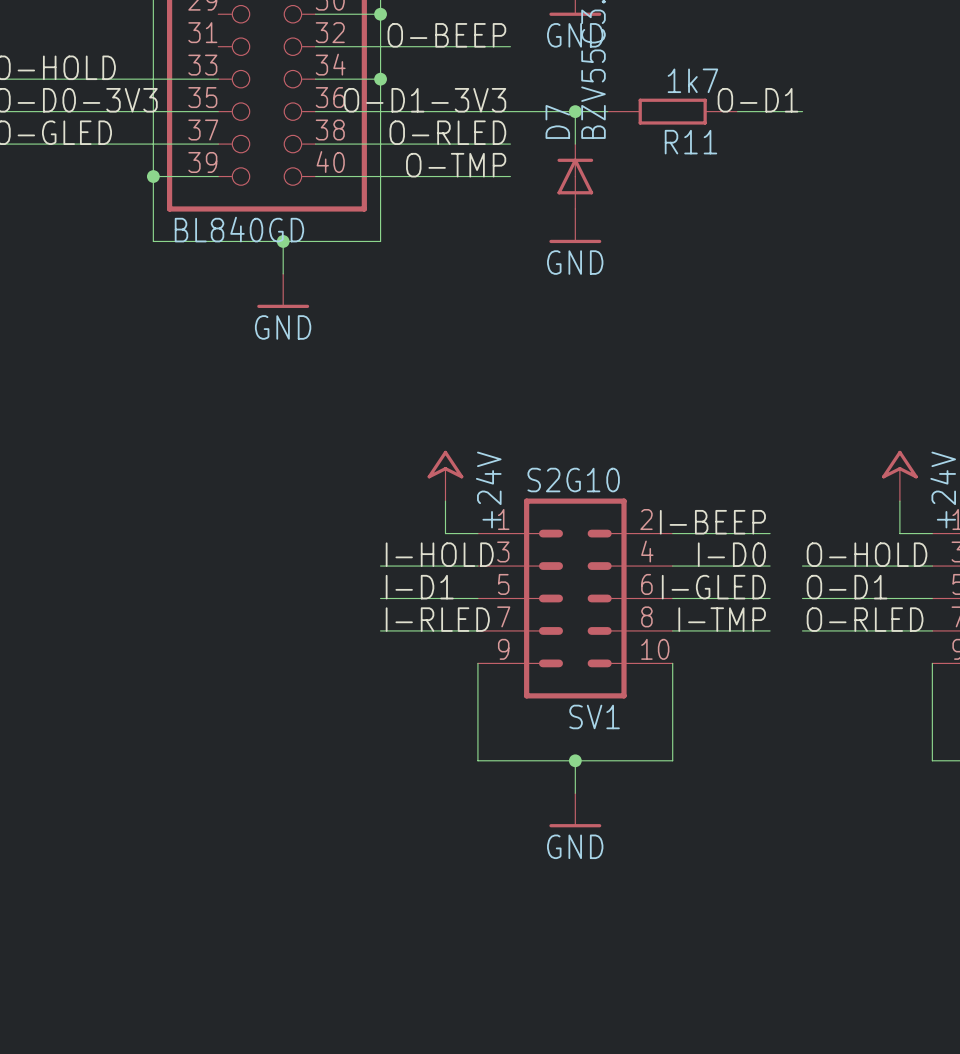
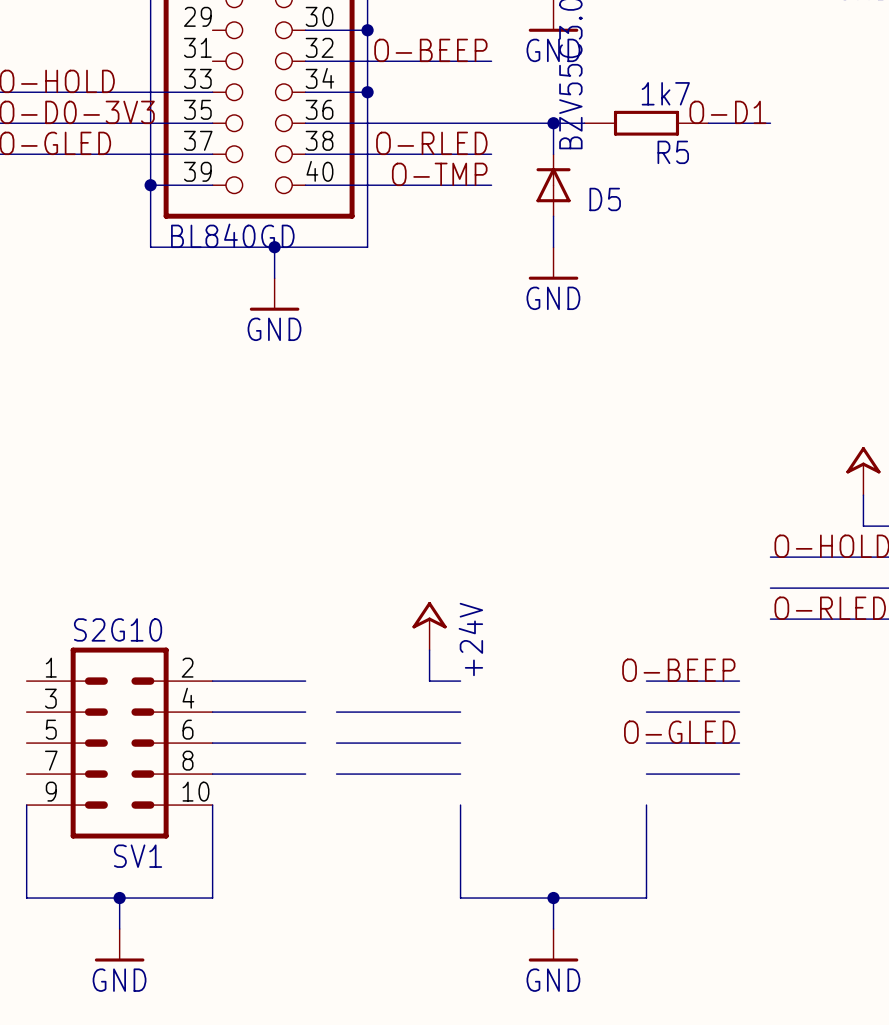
label: O-D1-3V3 (424, 100) -> none
D7 name: D7 (557, 121) -> D5 (605, 199)
R11 name: R11 (690, 142) -> R5 (673, 152)
power symbol position: GND (575, 226) -> GND (553, 263)
power symbol position: +24V (445, 475) -> +24V (429, 626)
wire: (445, 501) (445, 533) (477, 533) -> (429, 650) (429, 681) (460, 681)
label: I-BEEP (712, 522) -> none
wire: (672, 533) (770, 533) -> (646, 681) (739, 681)
label: I-HOLD (439, 554) -> none
label: I-D0 (731, 554) -> none
wire: (380, 566) (477, 566) -> (212, 681) (305, 681)
wire: (672, 566) (770, 566) -> (646, 712) (739, 712)
label: I-D1 (419, 587) -> none
label: I-GLED (713, 587) -> none
label: O-D1 (847, 587) -> none
wire: (380, 598) (477, 598) -> (212, 712) (305, 712)
SV1 position: (575, 598) -> (119, 743)
wire: (672, 598) (770, 598) -> (646, 743) (739, 743)
label: I-RLED (437, 619) -> none
label: I-TMP (722, 619) -> none
wire: (380, 630) (477, 630) -> (212, 743) (305, 743)
wire: (672, 630) (770, 630) -> (646, 774) (739, 774)
wire: (477, 663) (477, 760) (672, 760) (672, 663) -> (460, 805) (460, 898) (646, 898) (646, 805)
label: none -> O-BEEP (678, 670)
wire: none -> (336, 712) (460, 712)
label: none -> O-GLED (679, 732)
wire: none -> (336, 743) (460, 743)
wire: (575, 760) (575, 793) -> (553, 898) (553, 929)
junction: (575, 760) -> none
wire: none -> (212, 774) (305, 774)
wire: none -> (336, 774) (460, 774)
power symbol position: GND (575, 810) -> GND (553, 945)
wire: none -> (26, 805) (26, 898) (212, 898) (212, 805)
wire: none -> (119, 898) (119, 929)
junction: none -> (119, 898)
junction: none -> (553, 898)
power symbol: none -> GND (119, 945)

